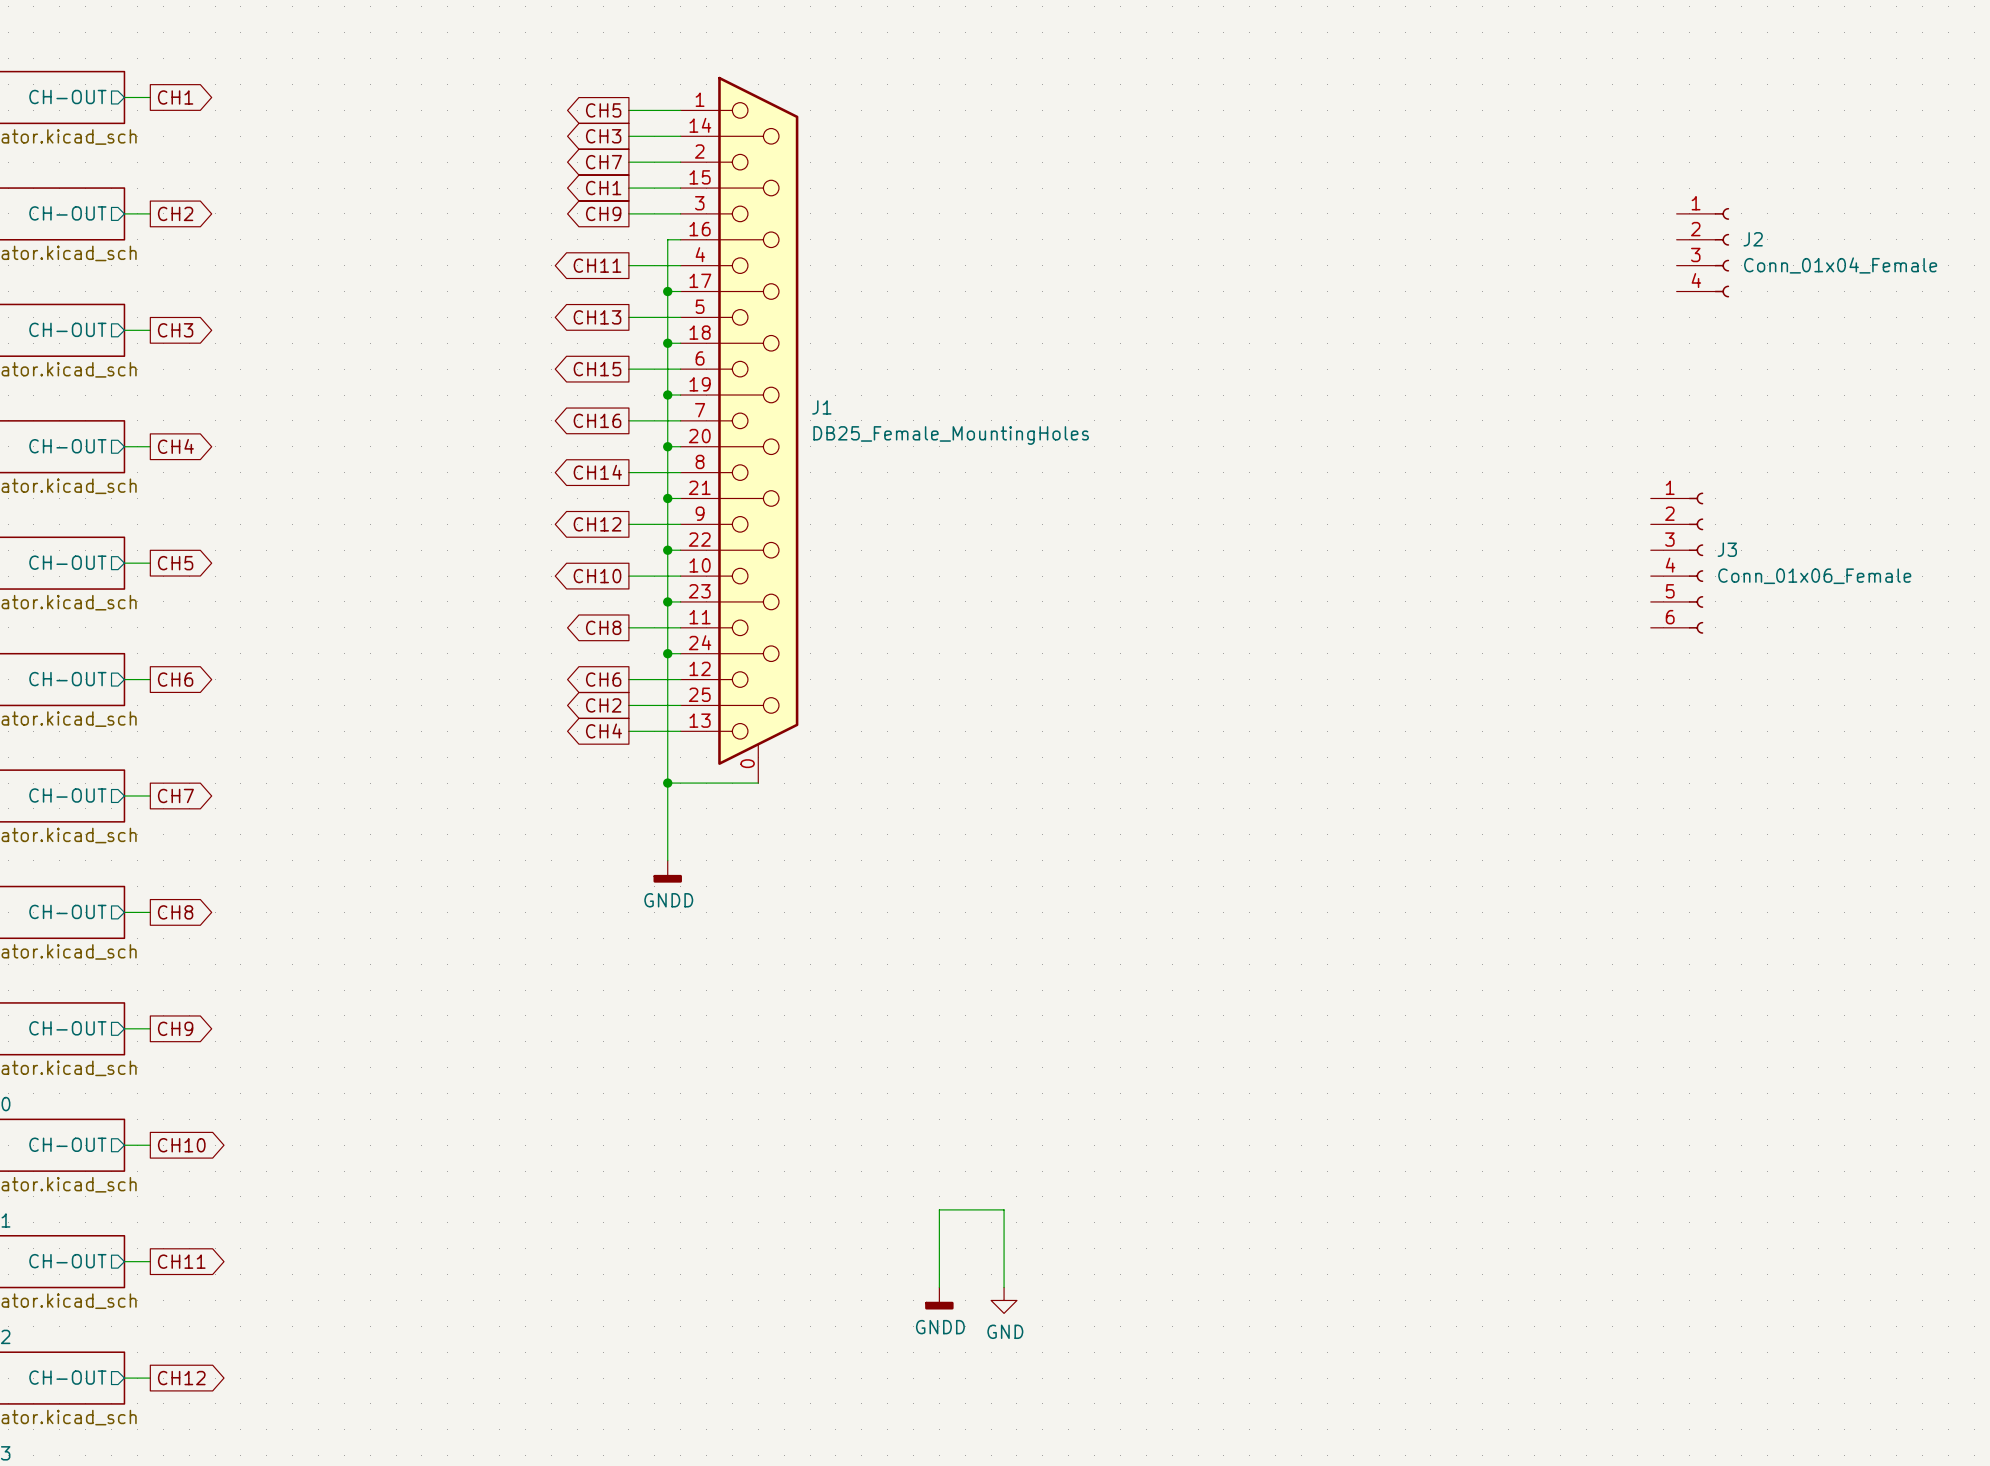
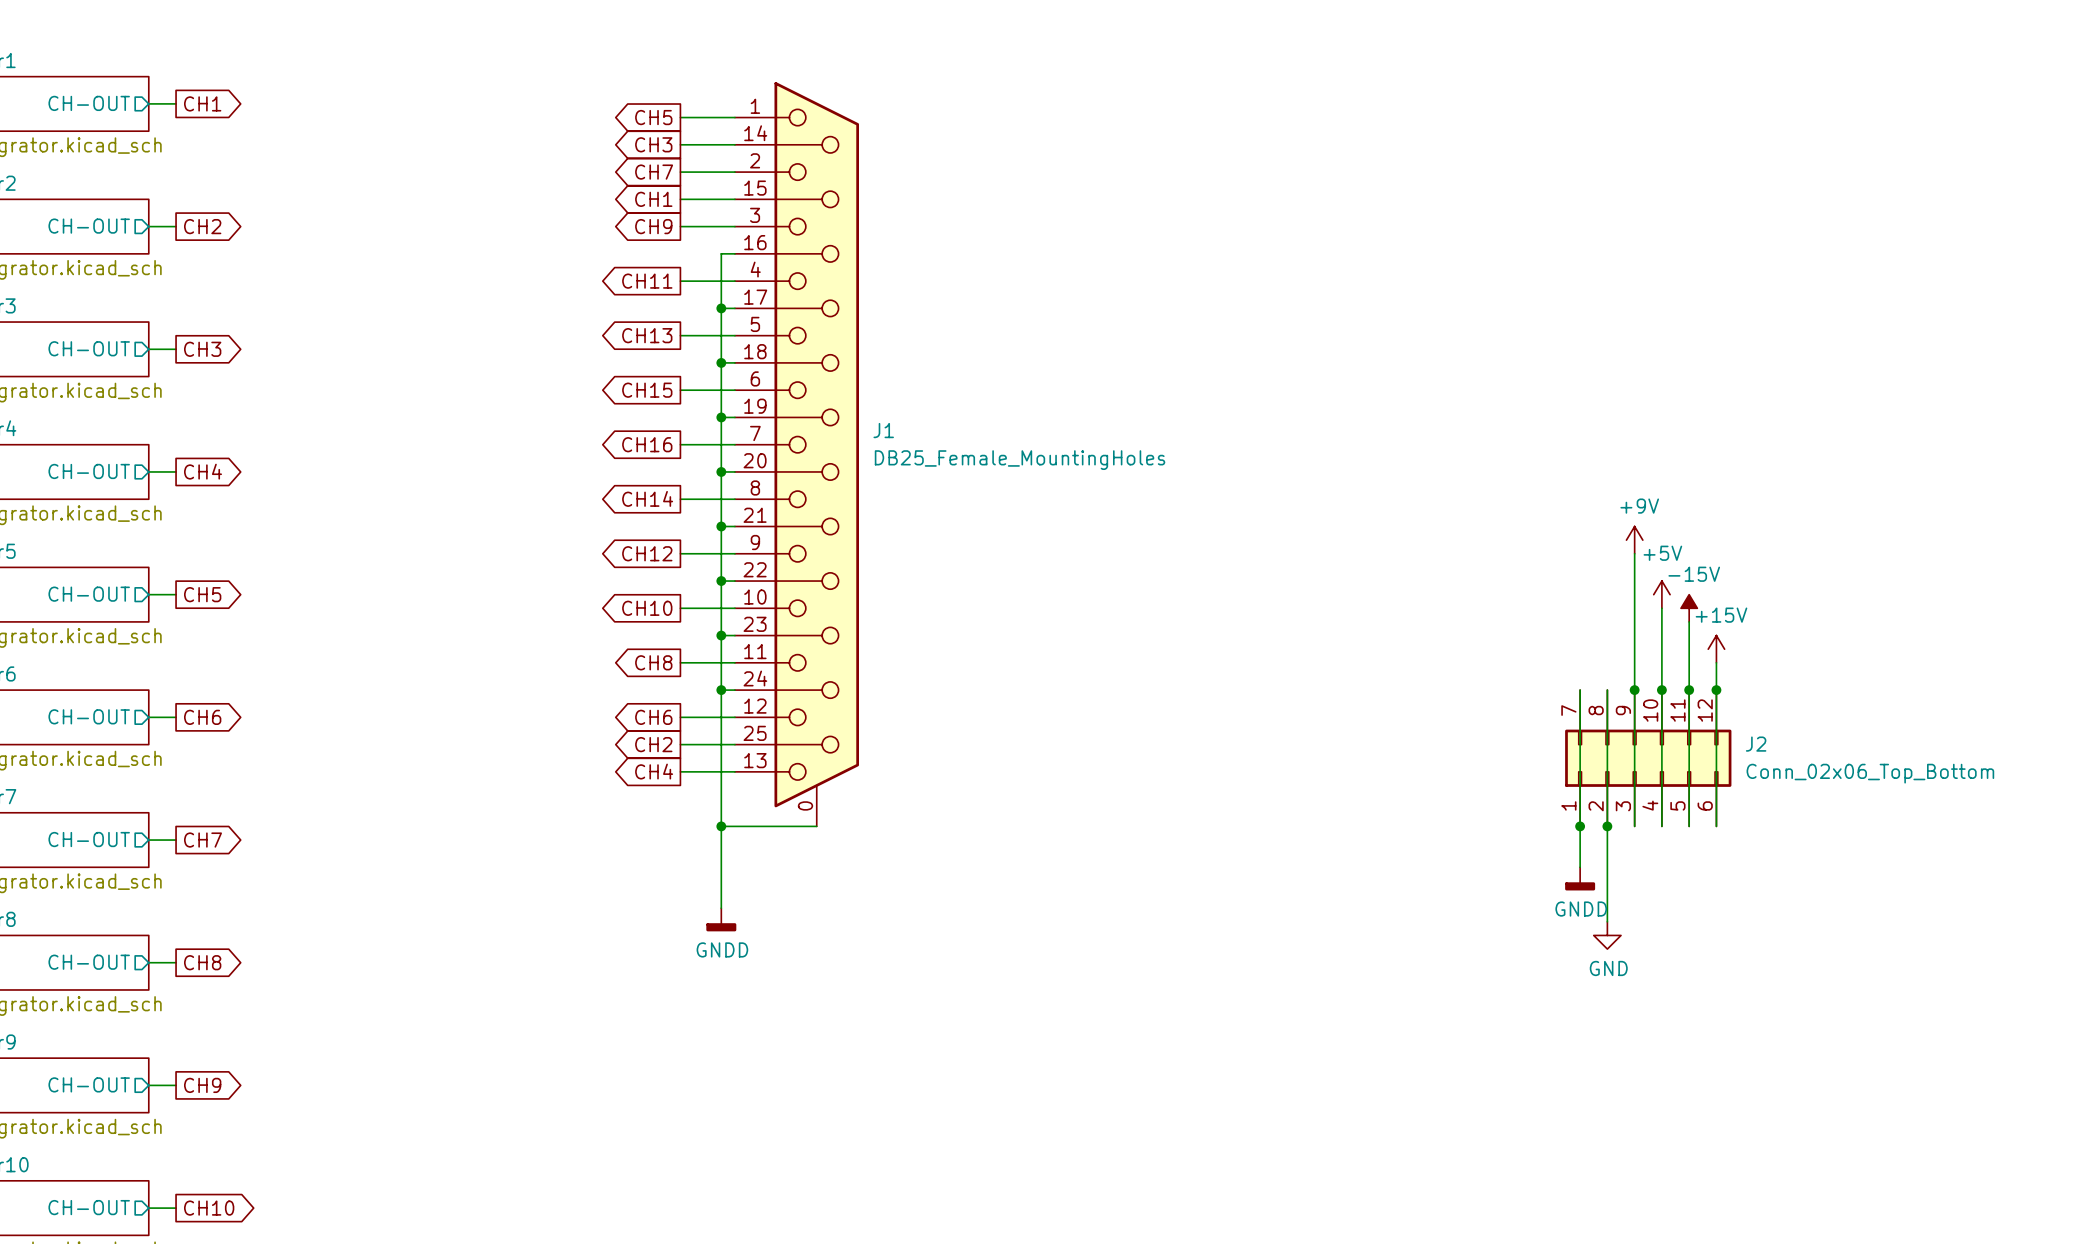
J2 symbol: [1676, 207, 1730, 298] -> [1565, 690, 1732, 827]
J2 name position: J2 (1753, 239) -> J2 (1756, 744)
J2 value: Conn_01x04_Female (1840, 265) -> Conn_02x06_Top_Bottom (1870, 773)
power symbol: none -> +9V (1634, 540)
wire: none -> (1634, 553) (1634, 826)
power symbol: none -> +5V (1661, 594)
J3: Conn_01x06_Female (1677, 563) -> none
wire: none -> (1661, 608) (1661, 826)
power symbol: none -> -15V (1689, 608)
wire: none -> (1689, 621) (1689, 826)
power symbol: none -> +15V (1716, 649)
wire: none -> (1716, 662) (1716, 826)
wire: none -> (1580, 690) (1580, 867)
wire: none -> (1607, 690) (1607, 921)
junction: none -> (1634, 690)
junction: none -> (1661, 690)
junction: none -> (1689, 690)
junction: none -> (1716, 690)
junction: none -> (1580, 826)
junction: none -> (1607, 826)
power symbol: none -> GNDD (1580, 878)
power symbol: none -> GND (1607, 935)

